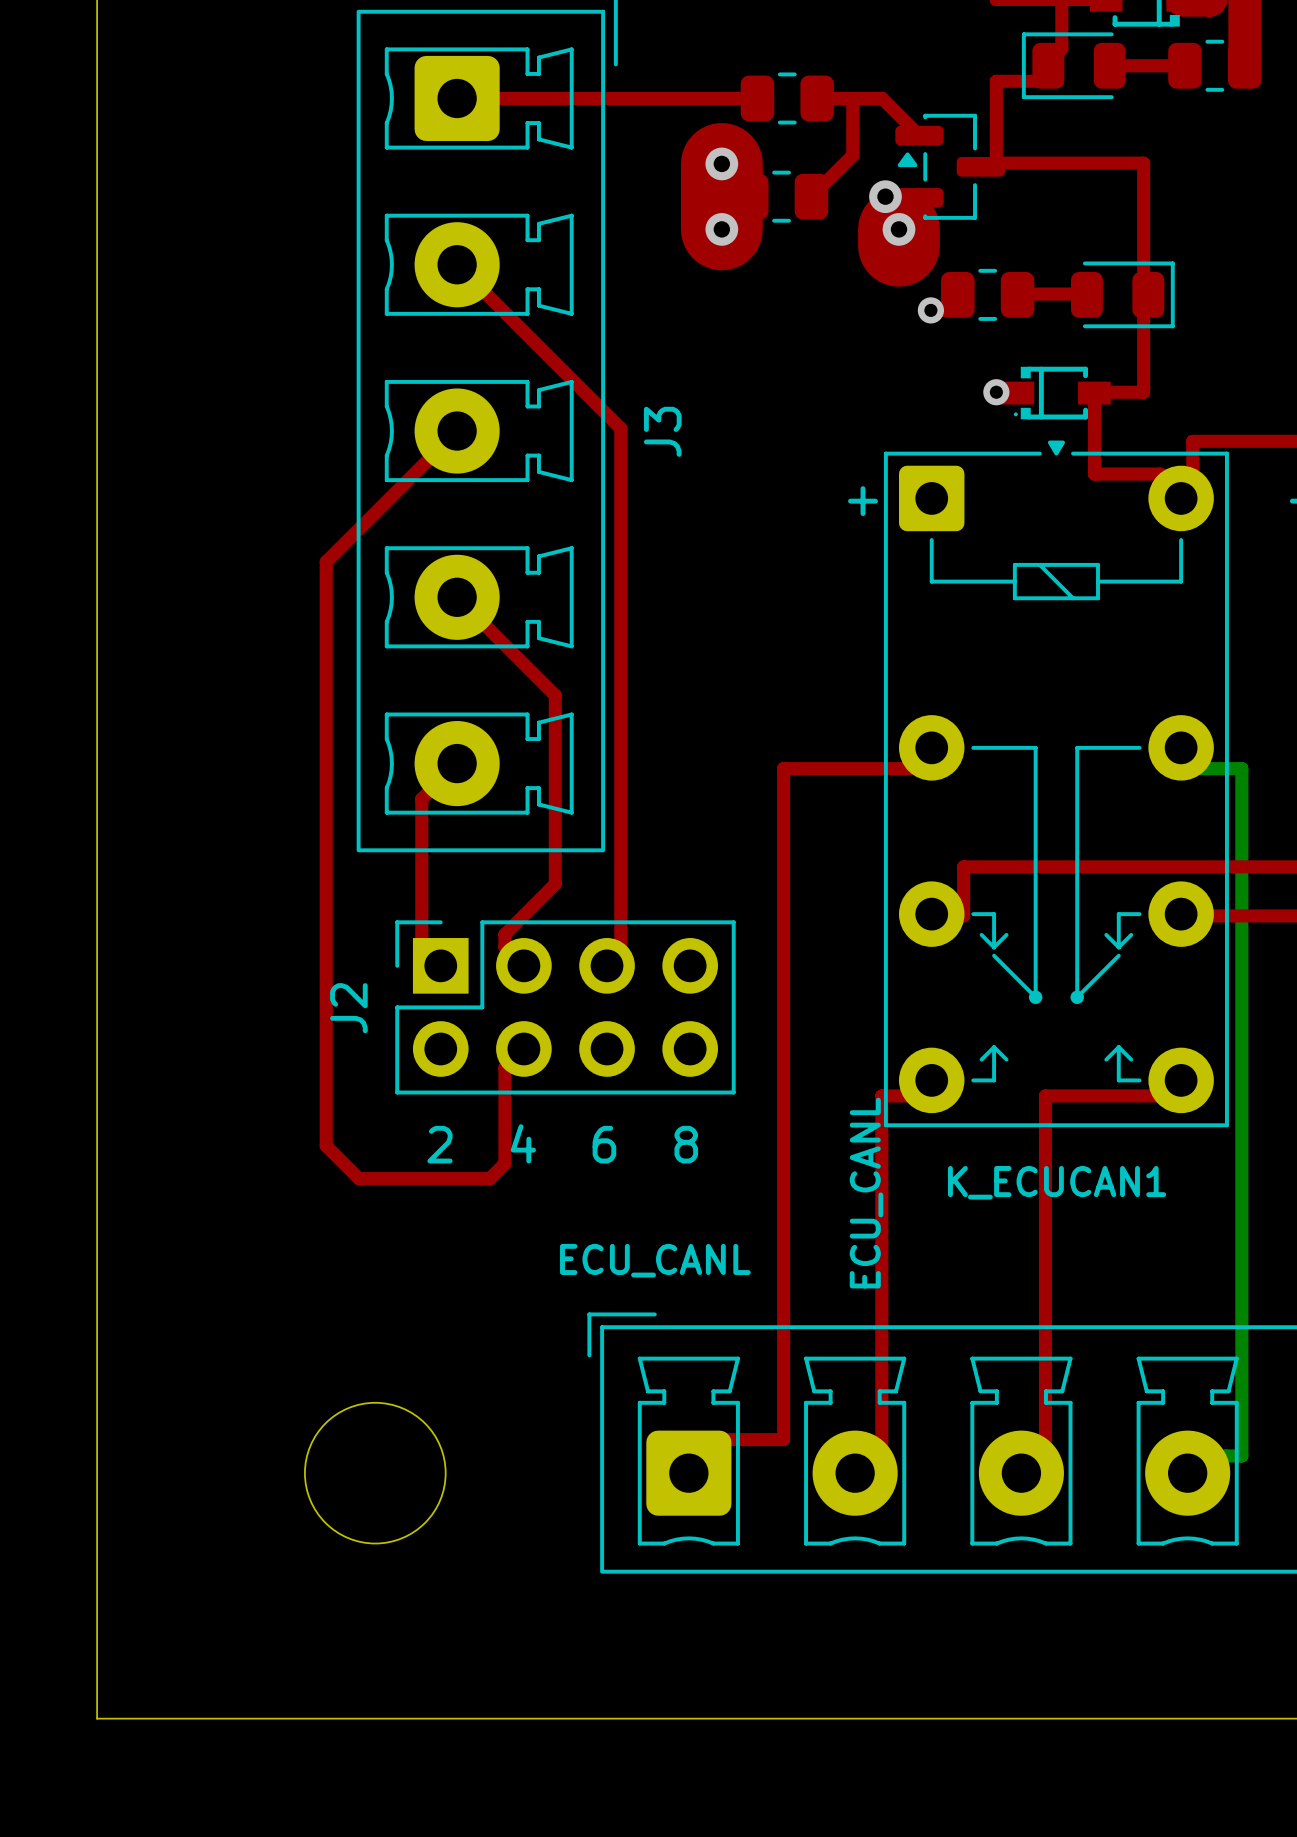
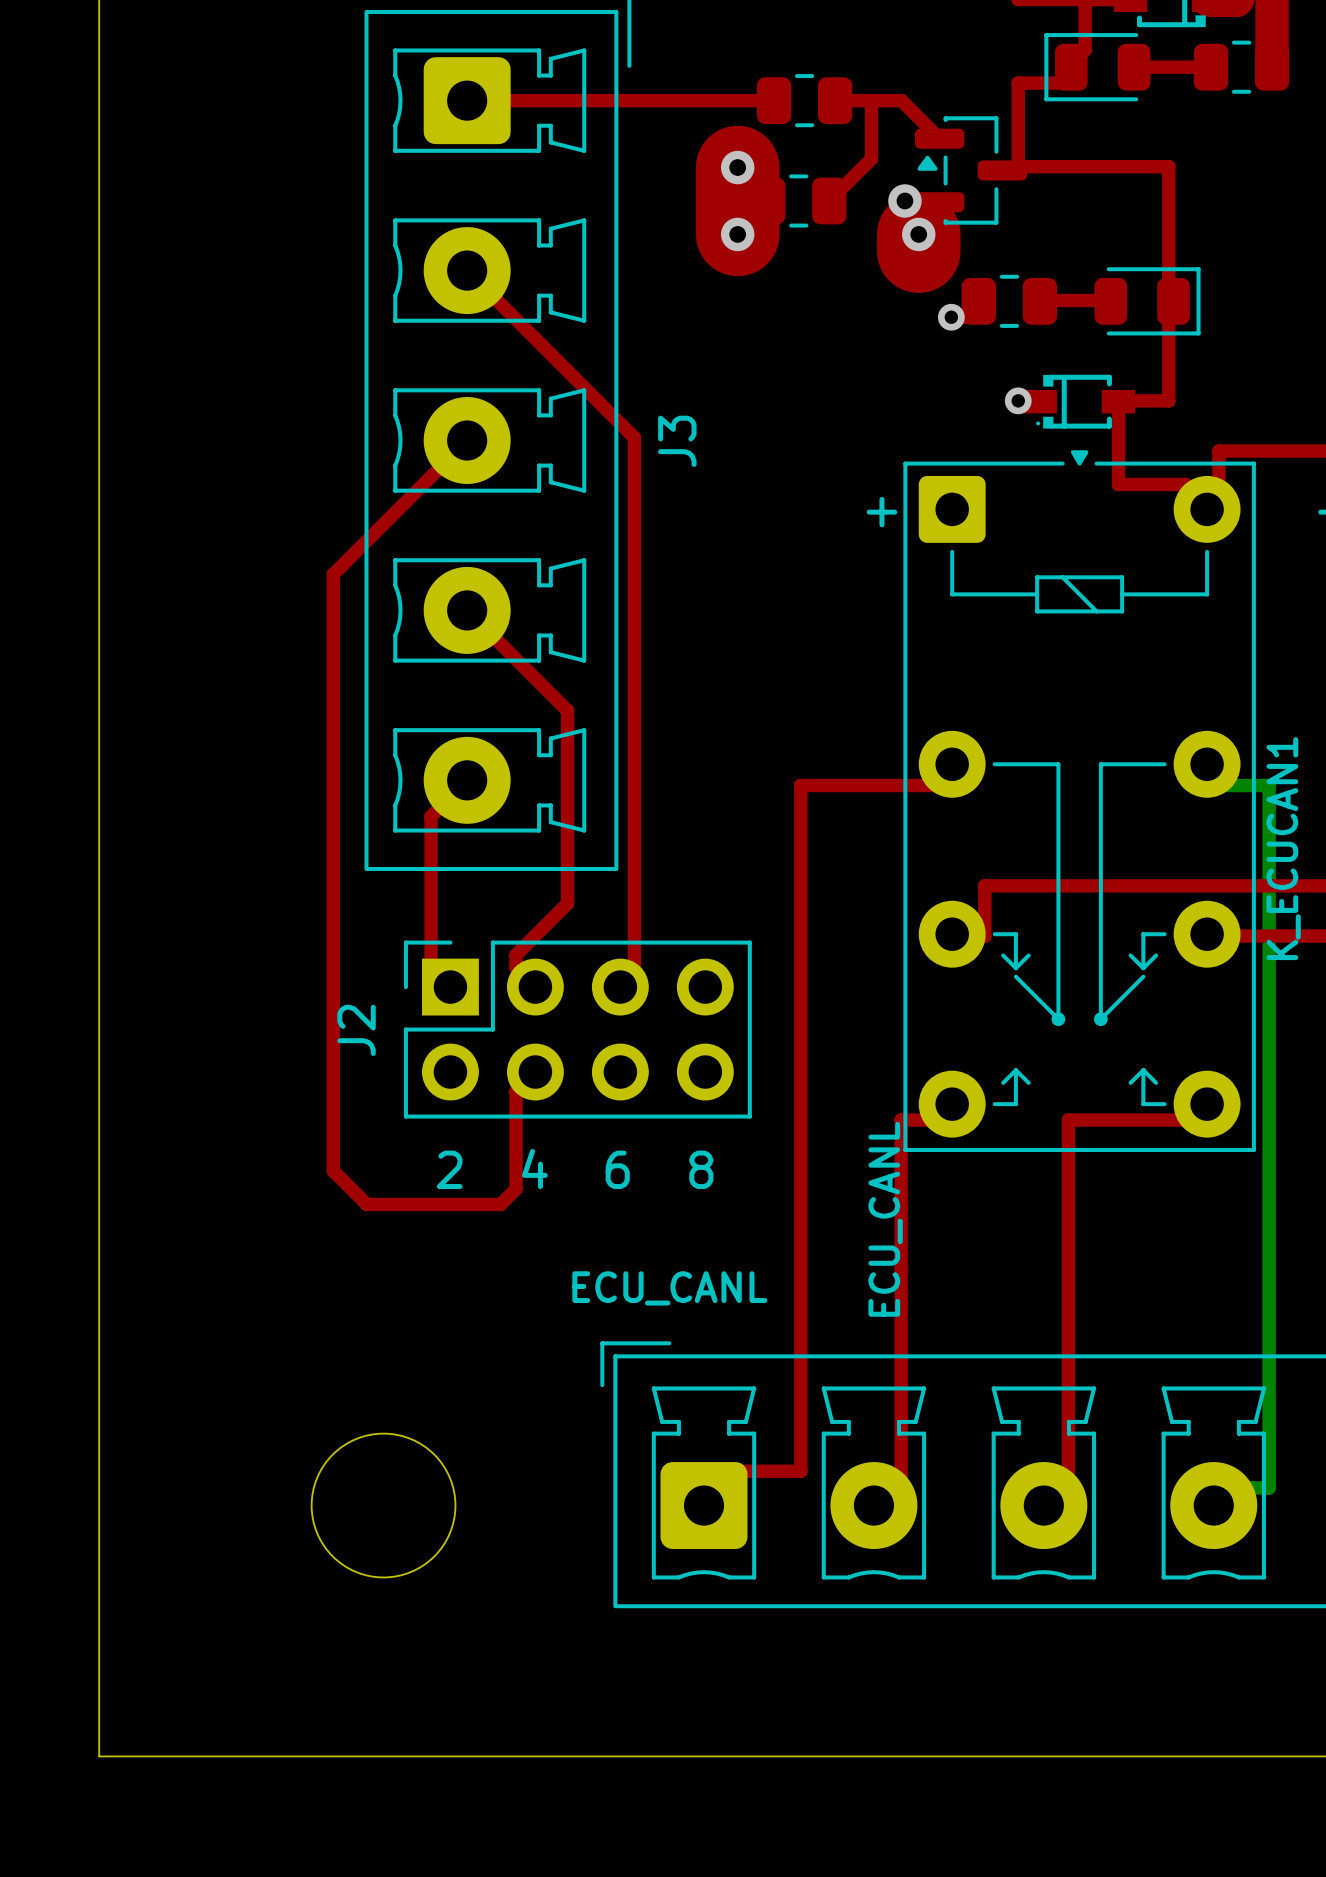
K_ECUCAN1 name rotation: 0° (1057, 1182) -> 90° counterclockwise (1283, 848)
K_ECUCAN1 name position: K_ECUCAN1 (1057, 1182) -> K_ECUCAN1 (1283, 848)

